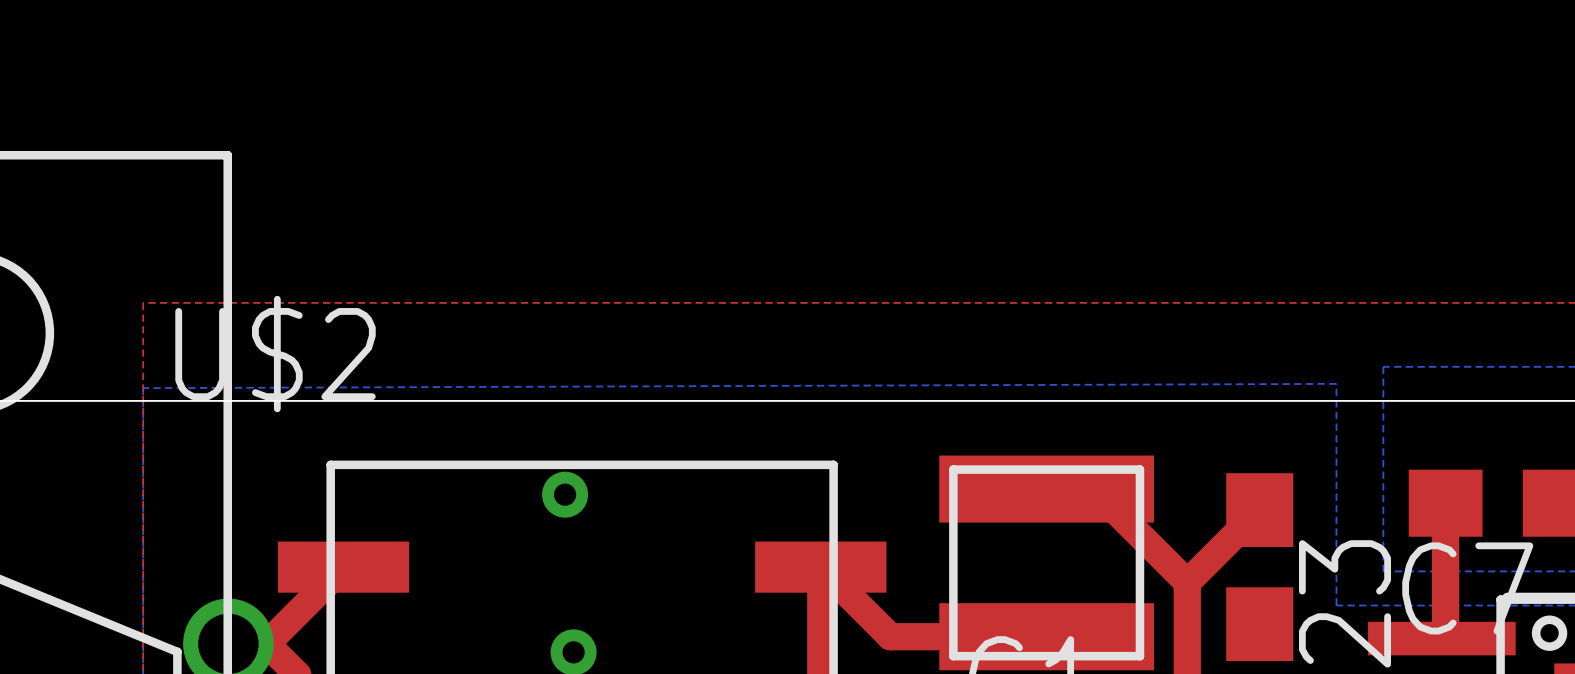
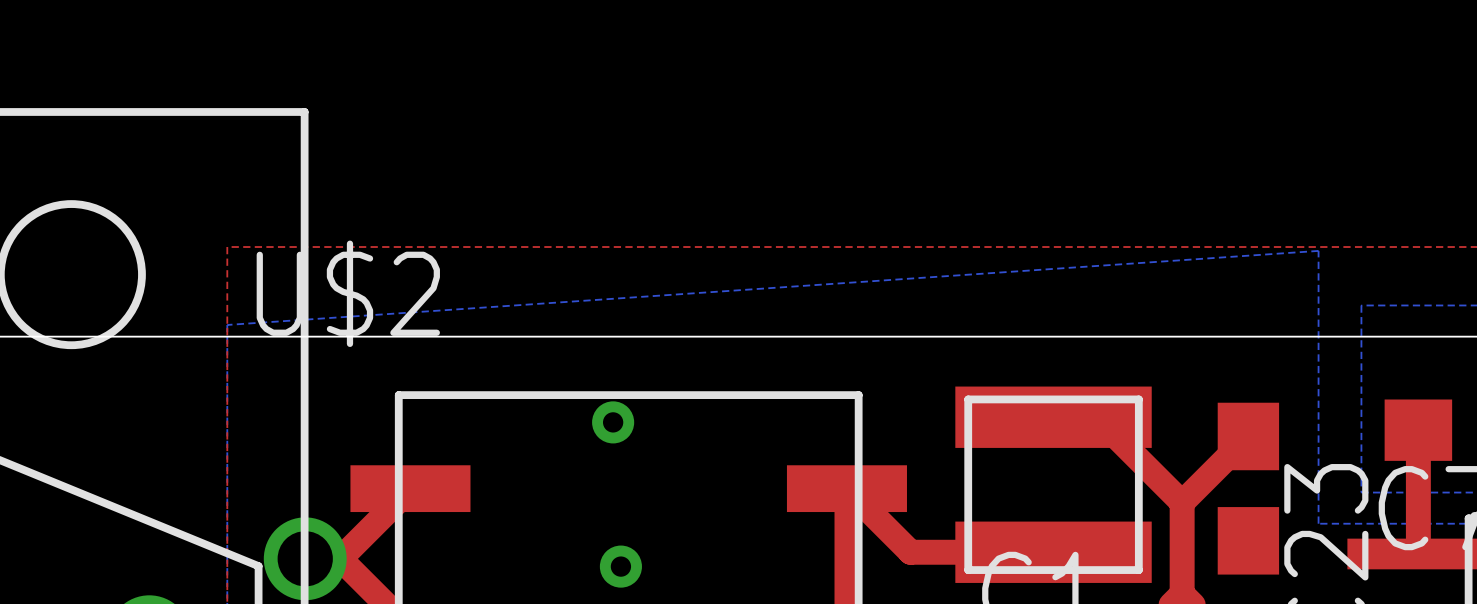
bottom zone outline: (1336, 383) (143, 388) -> (1318, 321) (1318, 250) (227, 324)

